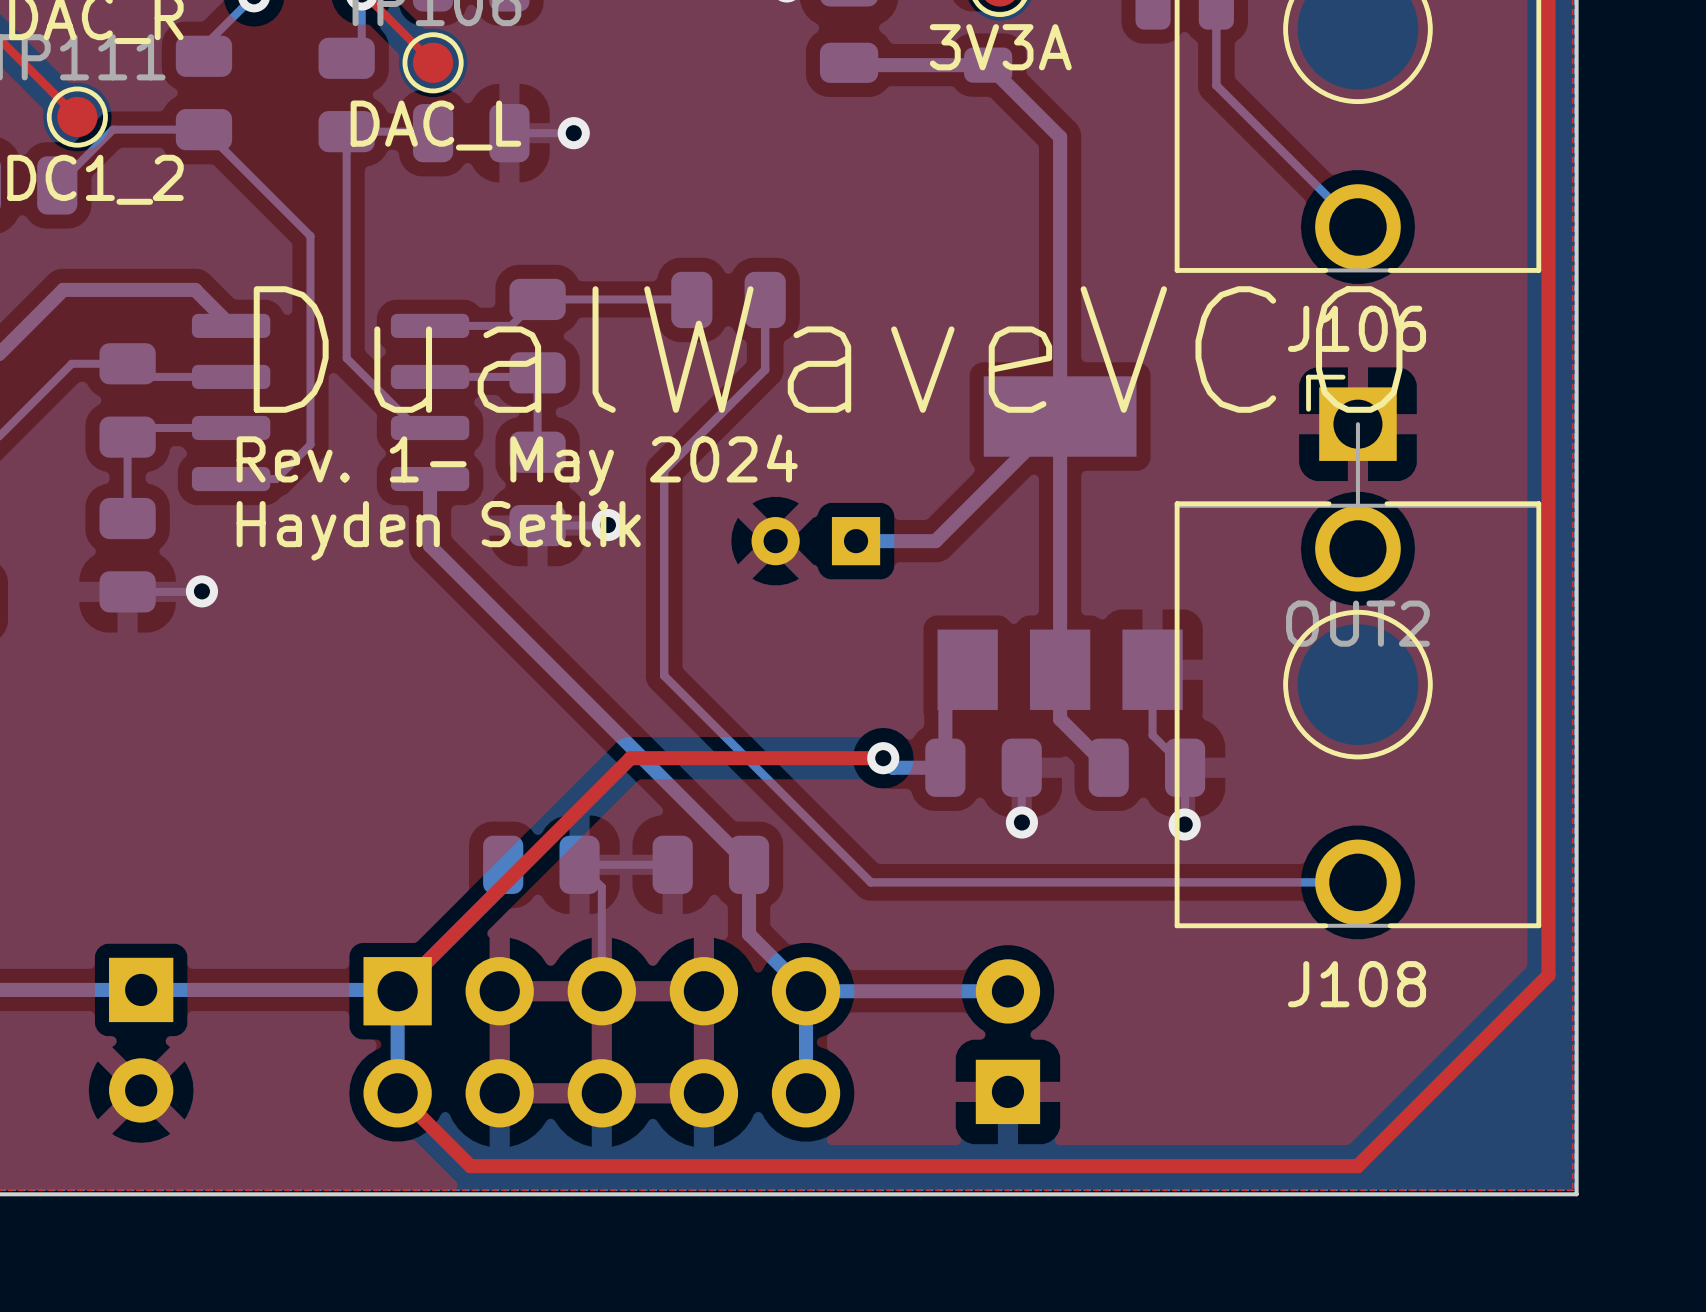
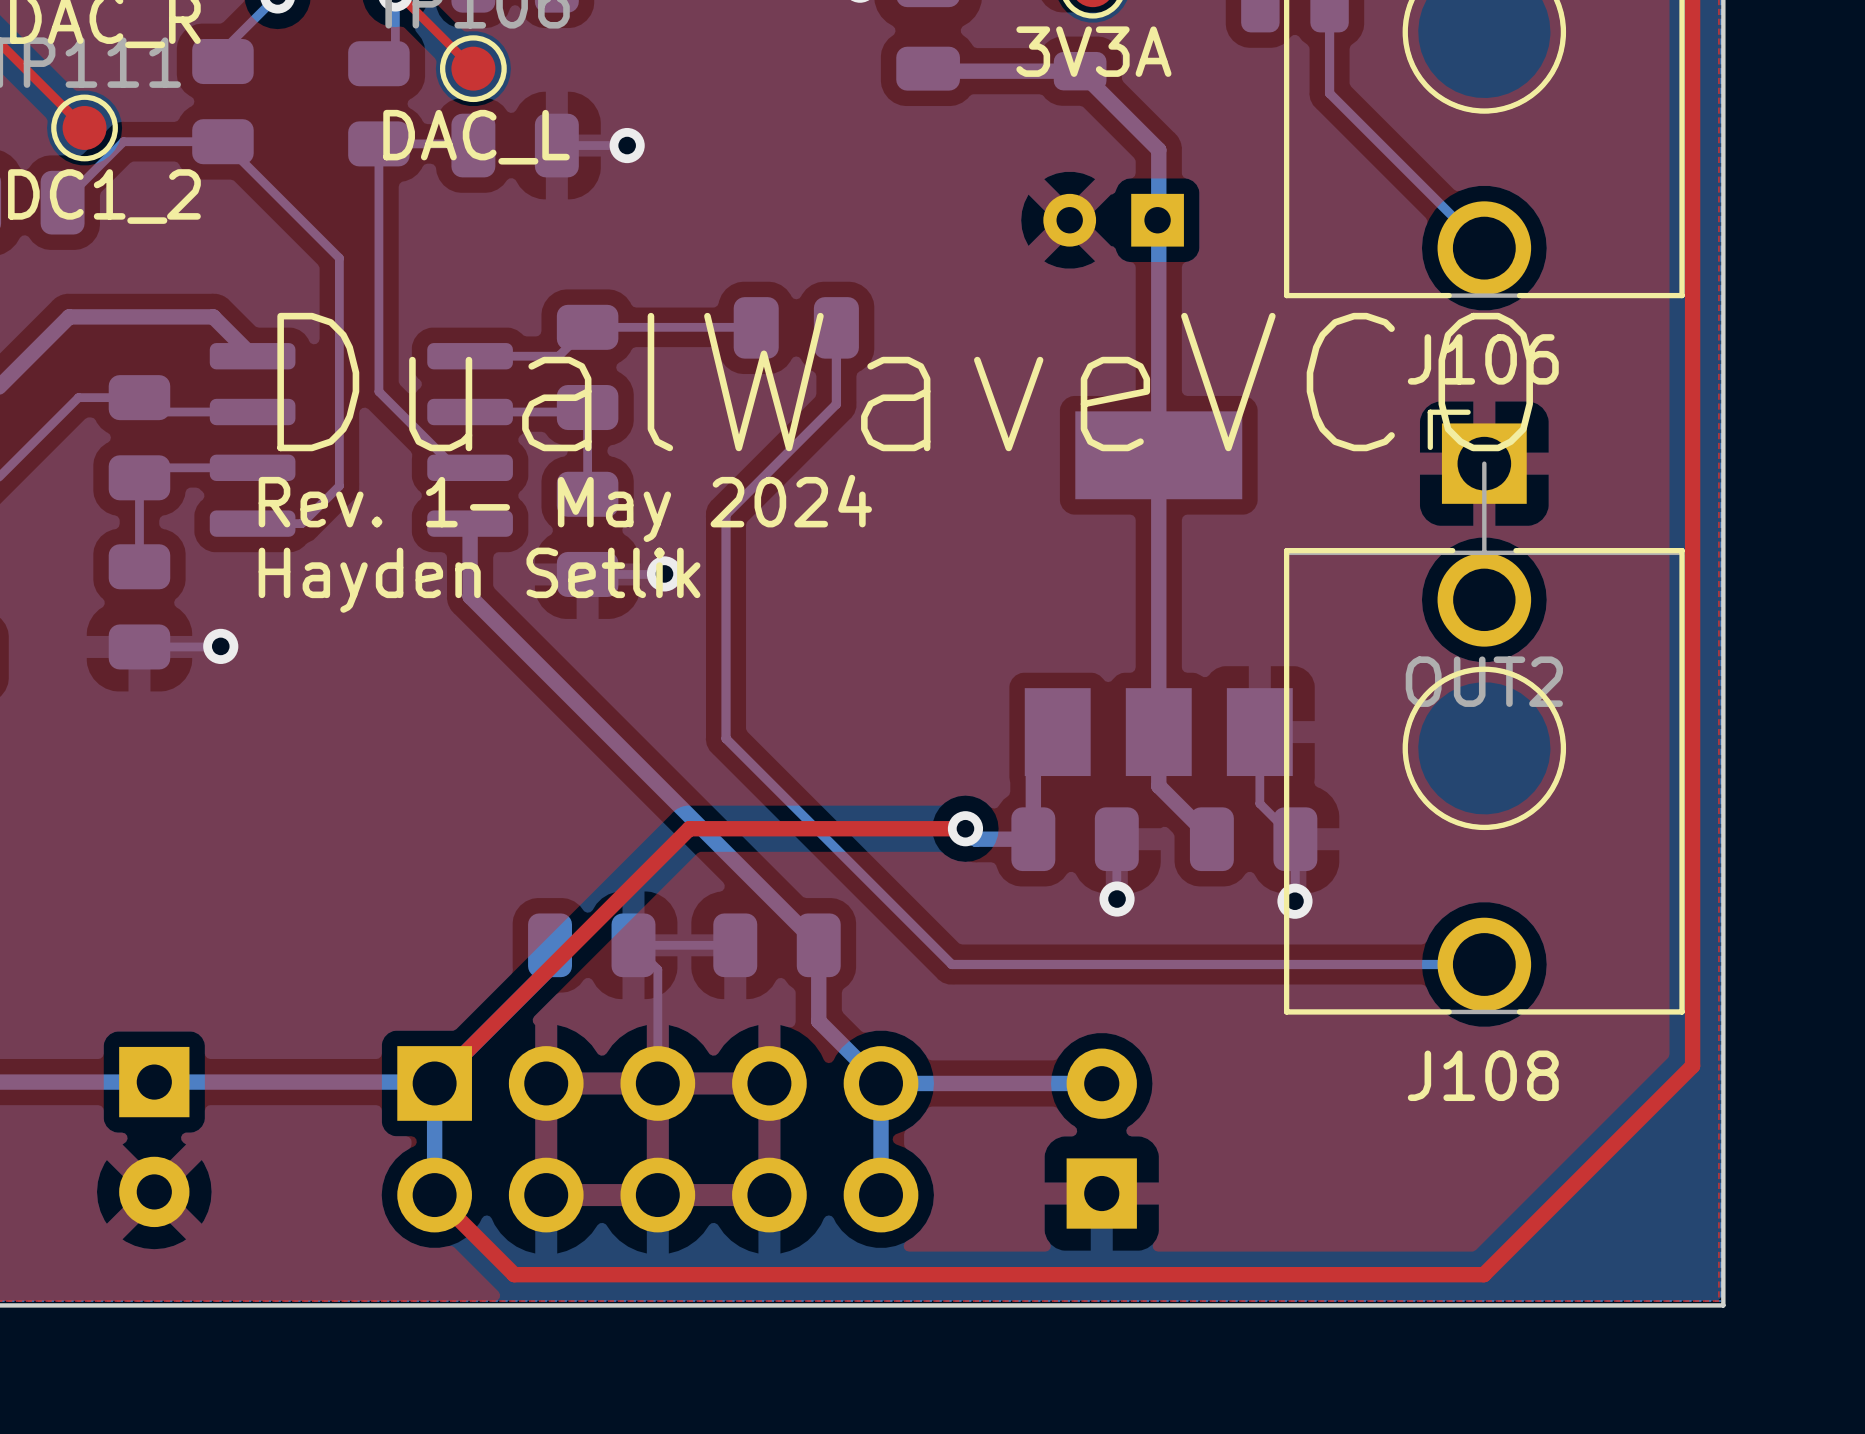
bottom track: (1060, 416) (935, 541) (856, 541) -> none
part position: (815, 541) -> (1113, 220)

